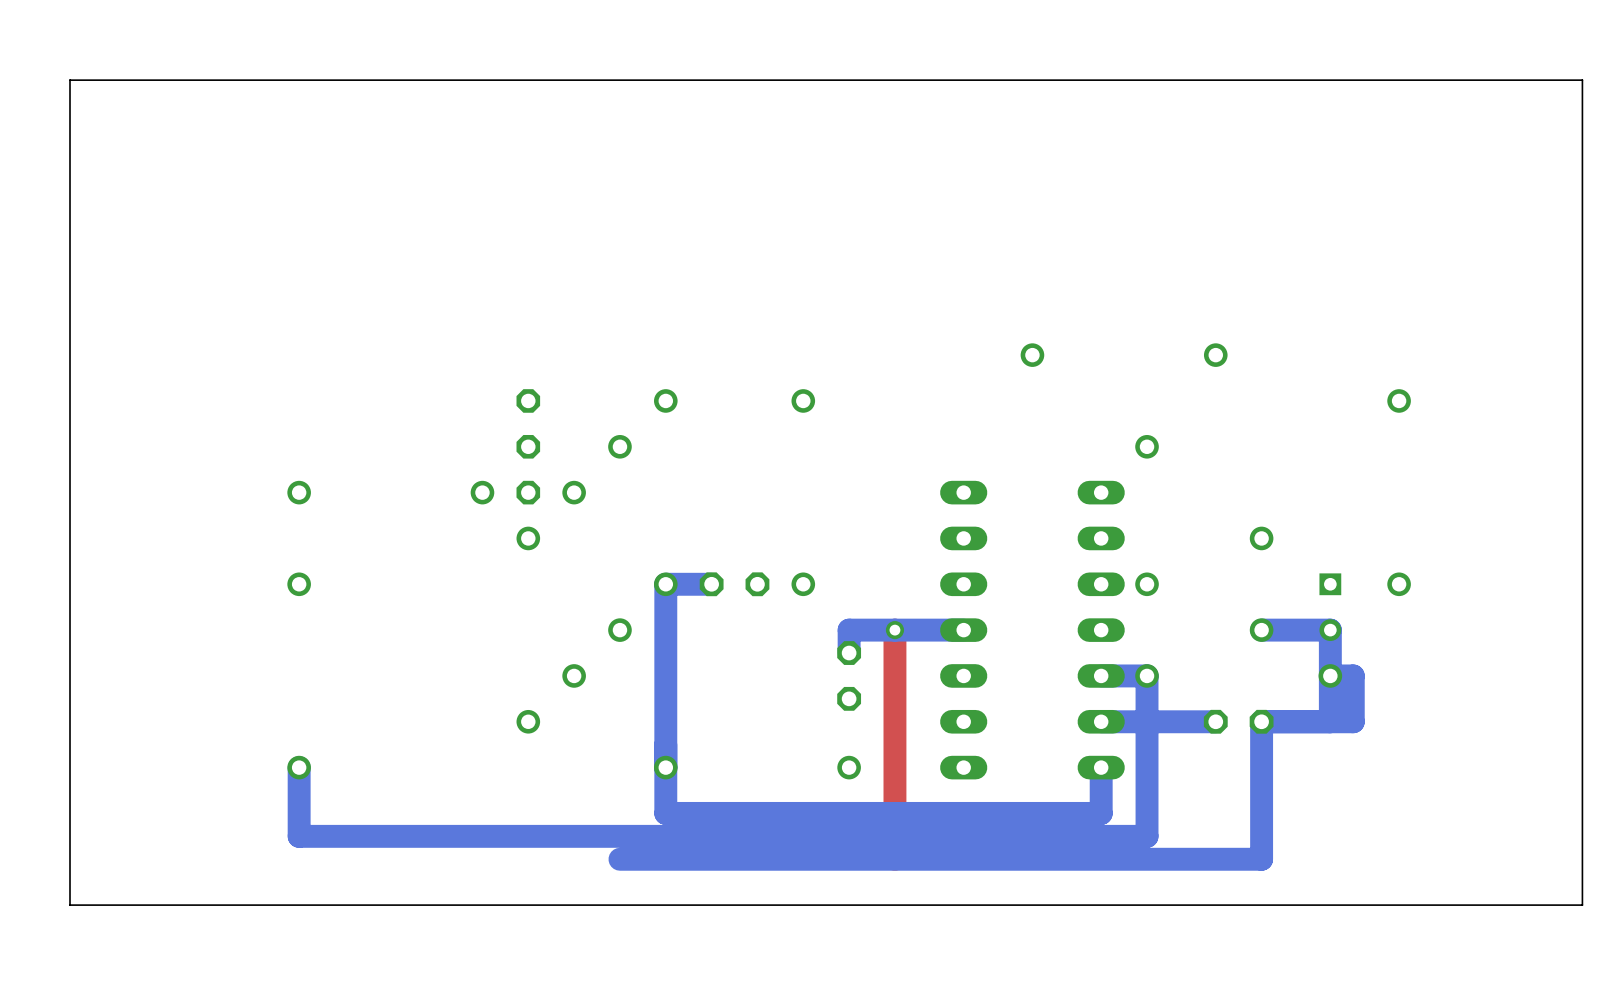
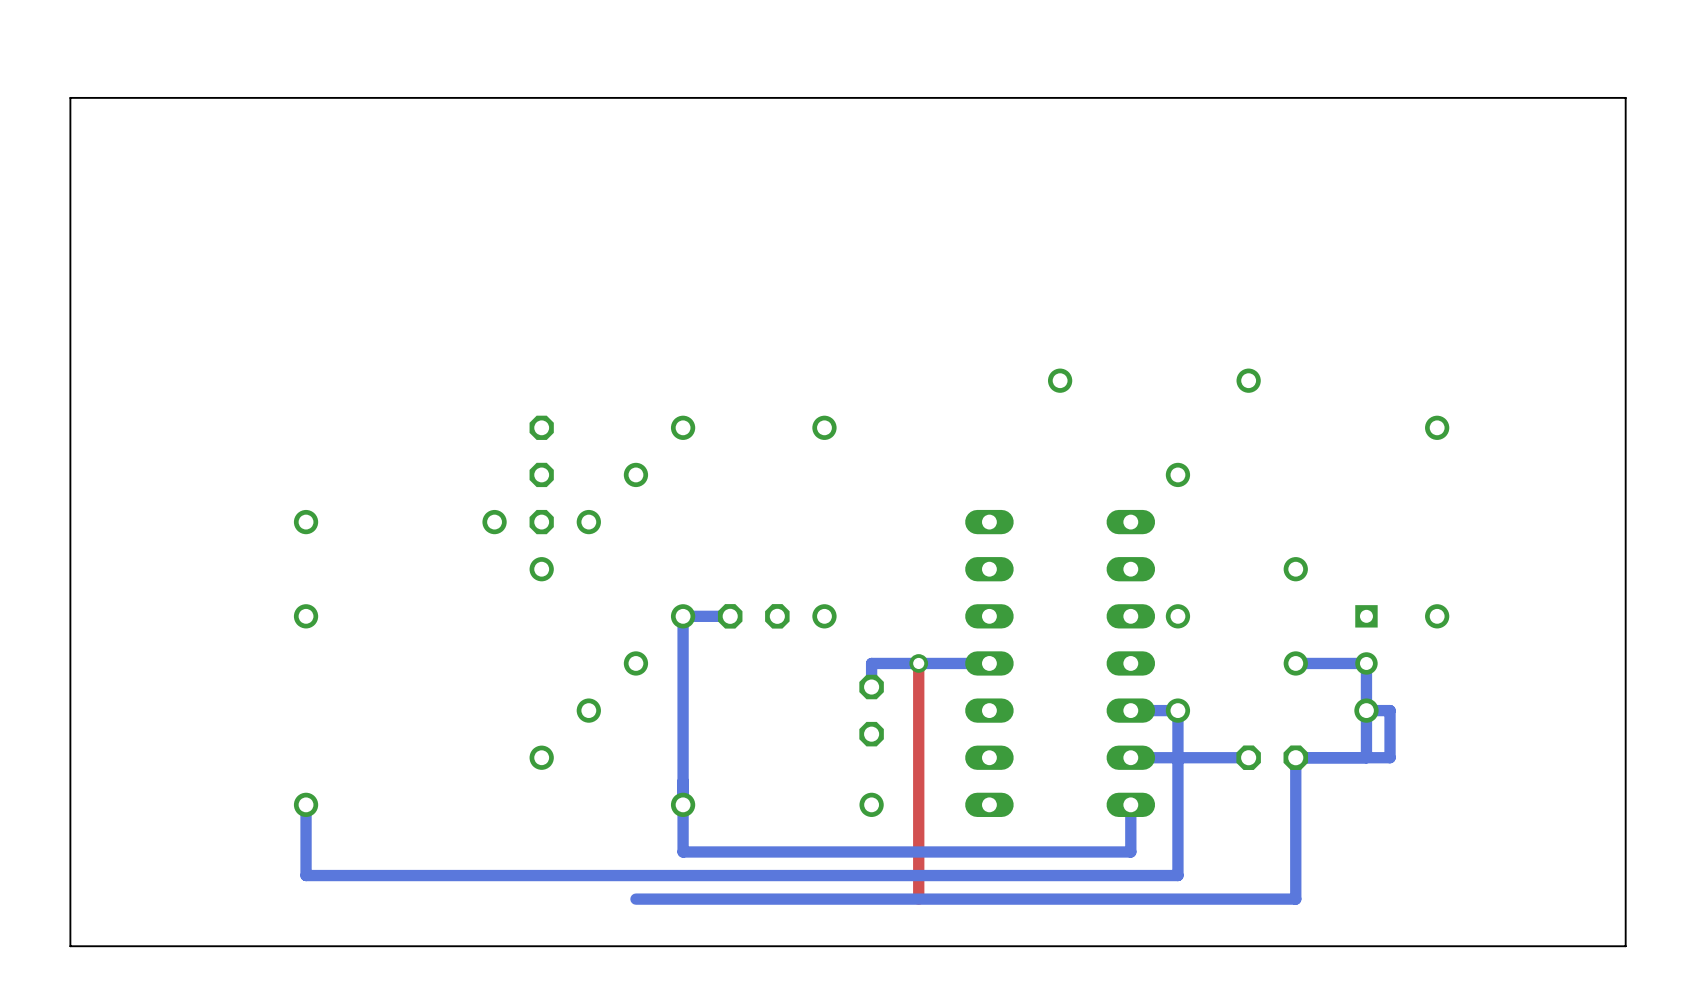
bottom track width: thick (711, 584) (665, 584) (665, 813) (1101, 813) (1101, 767) -> thin (730, 616) (683, 616) (683, 851) (1130, 851) (1130, 804)
top track width: thick (894, 630) (894, 859) -> thin (918, 663) (918, 899)
bottom track width: thick (963, 630) (849, 630) (849, 653) -> thin (989, 663) (871, 663) (871, 687)
bottom track width: thick (1261, 630) (1330, 630) (1330, 721) -> thin (1295, 663) (1366, 663) (1366, 757)
bottom track width: thick (1101, 675) (1147, 675) (1147, 836) (299, 836) (299, 767) -> thin (1130, 710) (1177, 710) (1177, 875) (306, 875) (306, 804)
bottom track width: thick (1330, 675) (1353, 675) (1353, 721) (1261, 721) (1261, 859) (619, 859) -> thin (1366, 710) (1390, 710) (1390, 757) (1295, 757) (1295, 899) (635, 899)
bottom track width: thick (1215, 721) (1101, 721) -> thin (1248, 757) (1130, 757)

